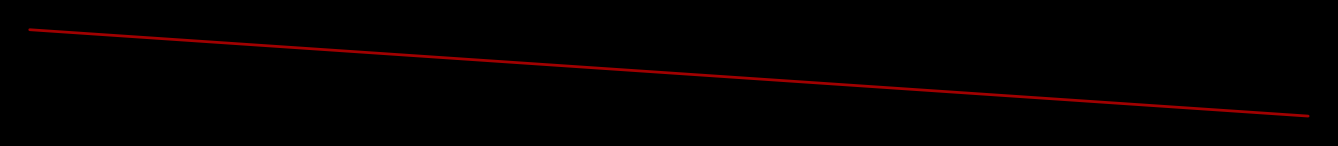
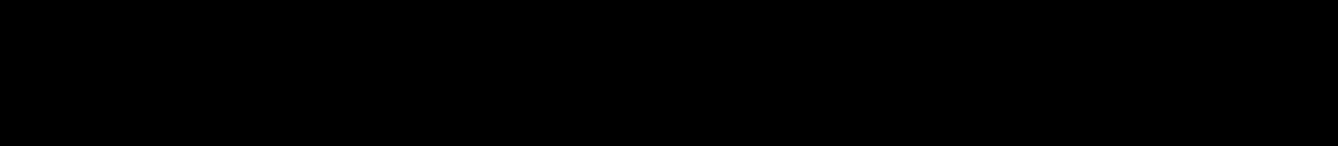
top track: (29, 29) (1308, 116) -> none

